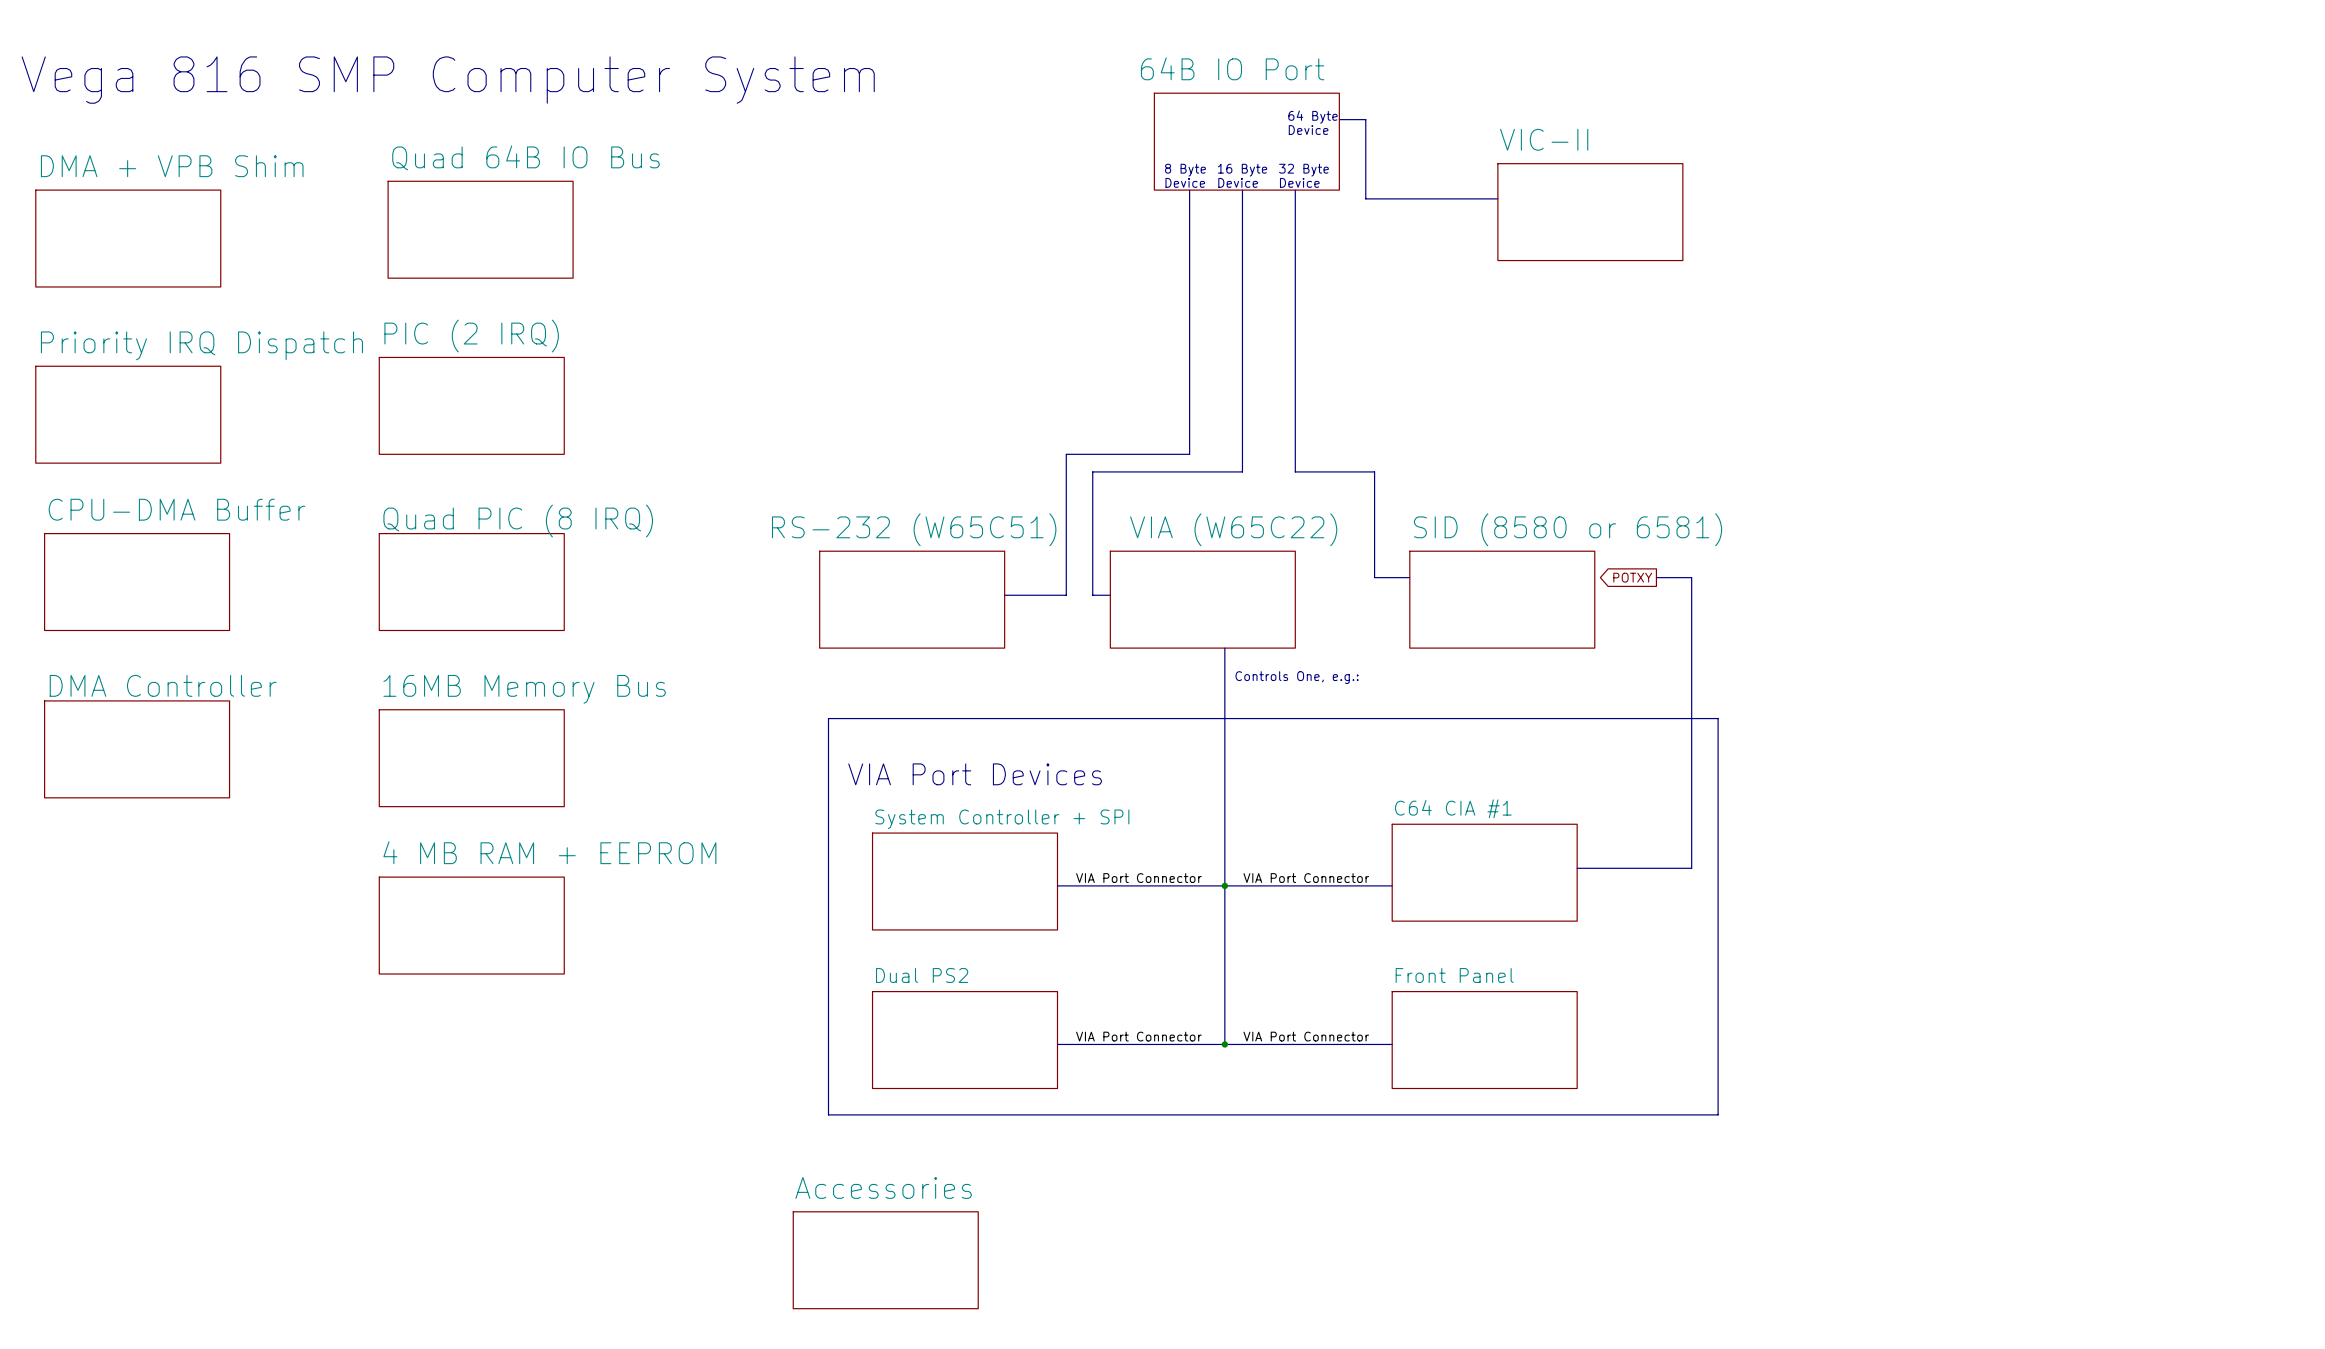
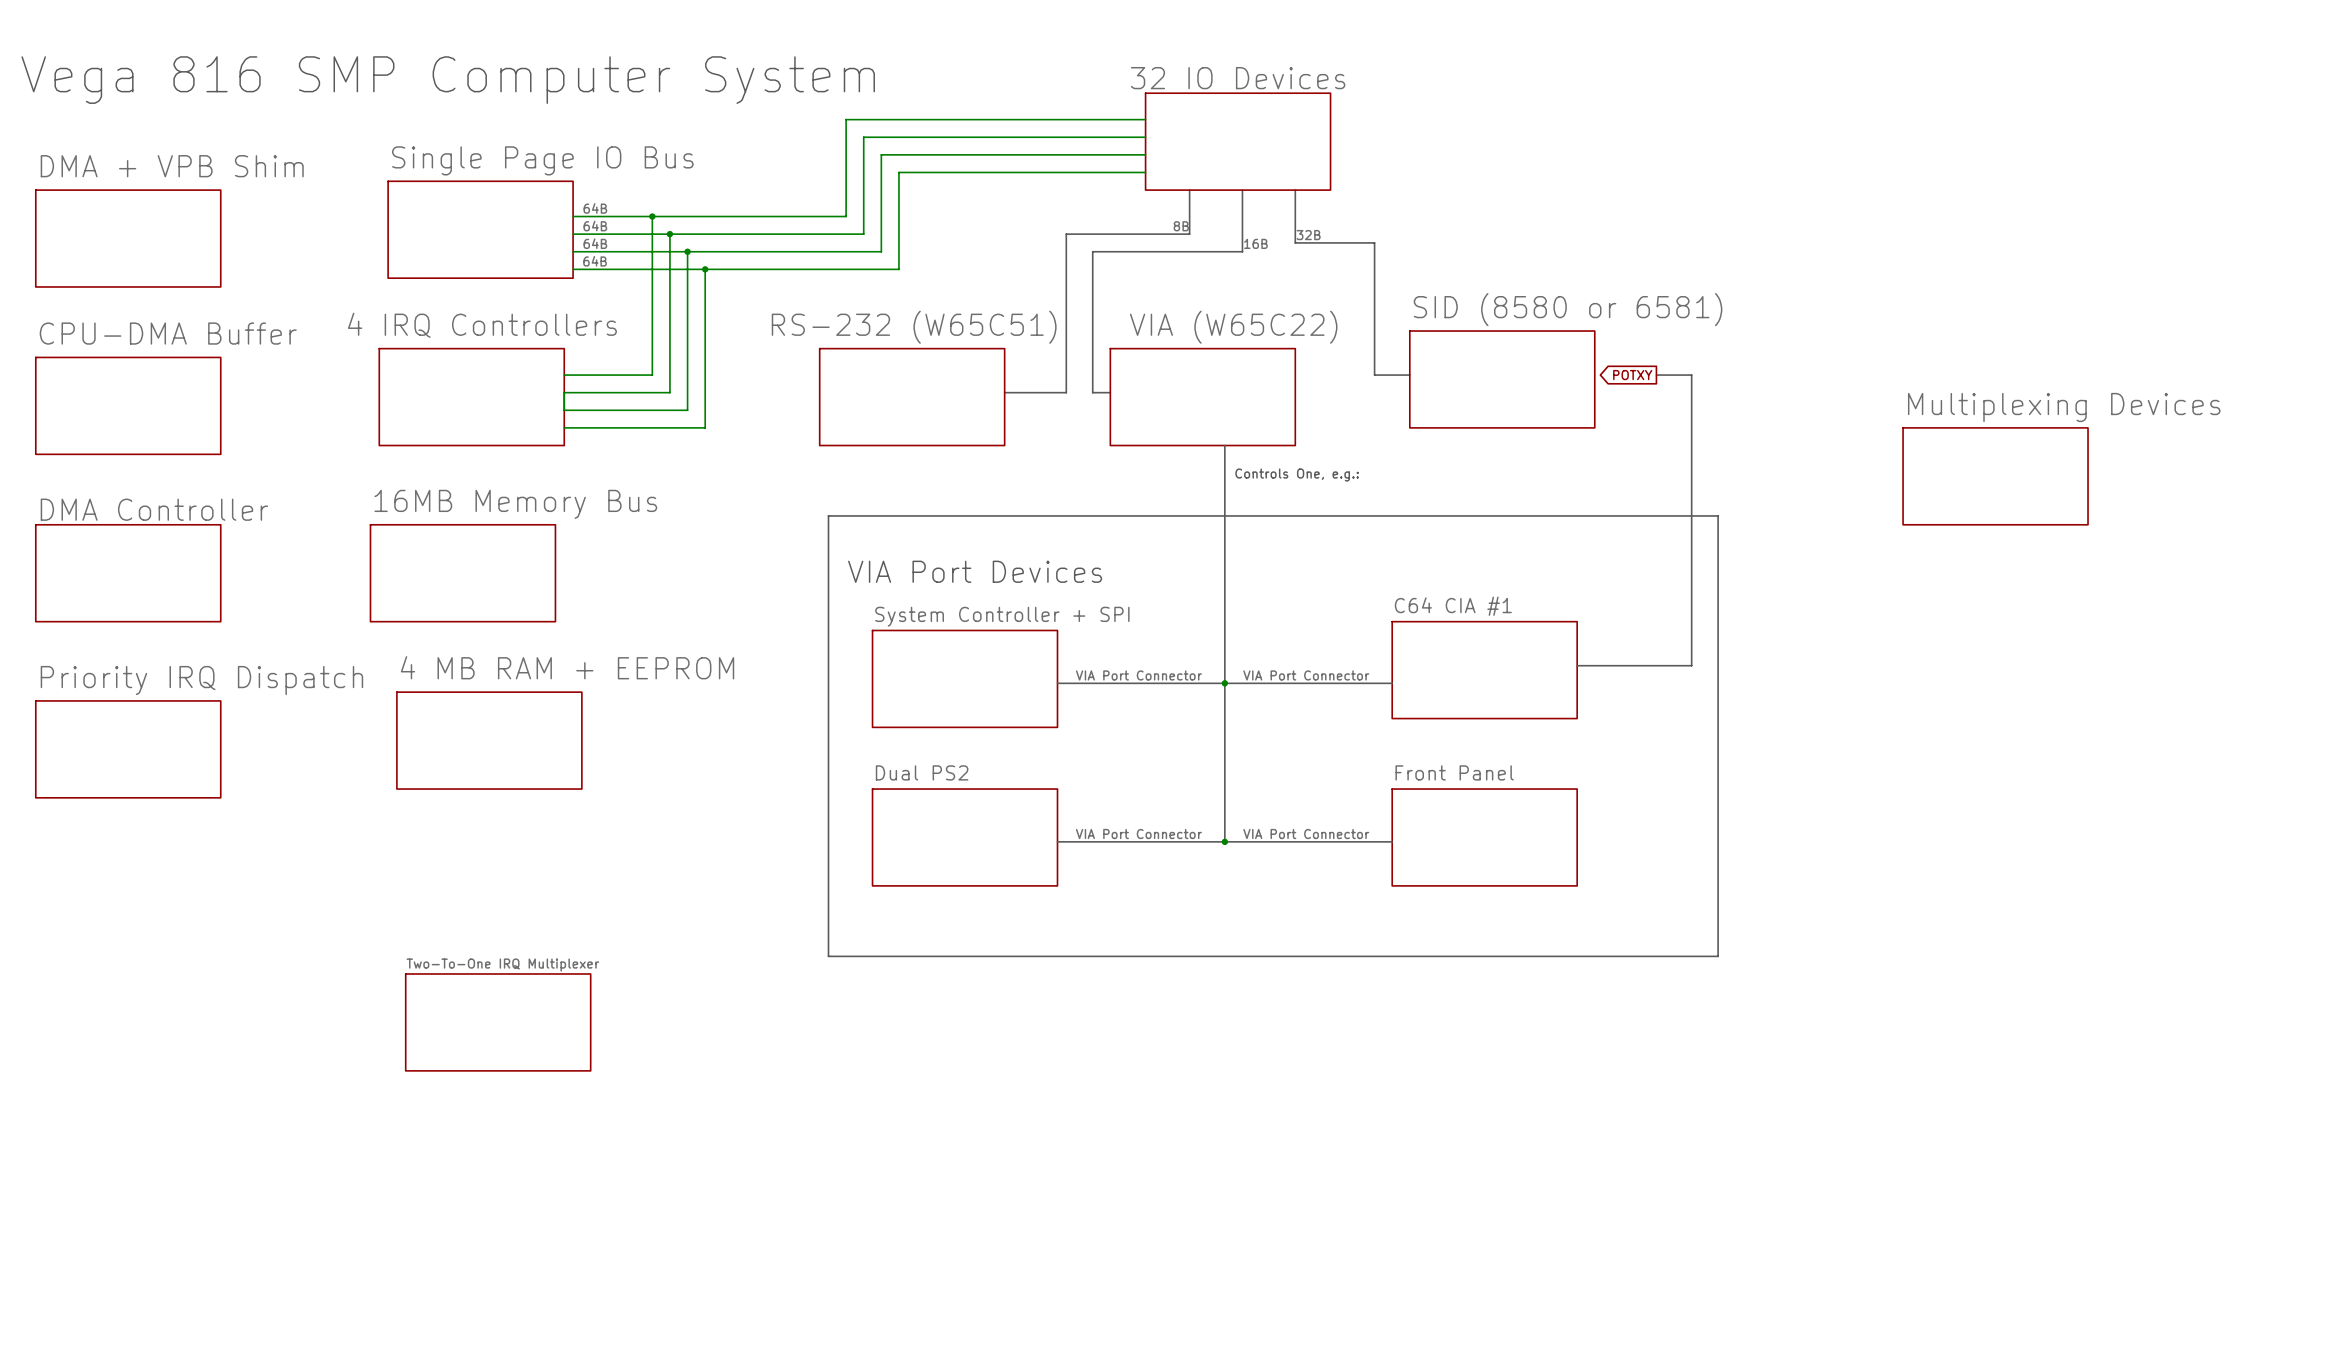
text: 64 Byte (1312, 117) -> none
wire: none -> (1145, 119) (846, 119) (846, 216) (573, 216)
line: (1339, 119) (1365, 119) (1365, 198) (1497, 198) -> none
text: Device (1308, 130) -> none
wire: none -> (1145, 137) (863, 137) (863, 234) (573, 234)
sheet 32 IO Devices: none -> (1238, 141)
sheet 64B IO Port: (1246, 141) -> none
wire: none -> (1145, 154) (881, 154) (881, 251) (573, 251)
sheet Quad 64B IO Bus name: Quad 64B IO Bus (526, 157) -> Single Page IO Bus (542, 160)
text: 8 Byte (1185, 170) -> none
text: 16 Byte (1242, 170) -> none
text: 32 Byte (1303, 170) -> none
wire: none -> (1145, 172) (898, 172) (898, 269) (573, 269)
text: Device (1185, 182) -> none
text: Device (1238, 182) -> none
text: Device (1299, 182) -> none
label: none -> 64B (595, 208)
sheet VIC-II: (1590, 212) -> none
wire: none -> (652, 216) (652, 375) (564, 375)
junction: none -> (652, 216)
label: none -> 64B (595, 226)
label: none -> 8B (1181, 226)
wire: none -> (669, 234) (669, 392) (564, 392) (564, 410) (687, 410) (687, 251)
junction: none -> (669, 234)
line: (1189, 234) (1189, 454) (1066, 454) (1066, 595) (1004, 595) -> (1189, 234) (1066, 234) (1066, 392) (1004, 392)
label: none -> 32B (1308, 235)
line: (1295, 242) (1295, 471) (1374, 471) (1374, 577) (1409, 577) -> (1295, 242) (1374, 242) (1374, 375) (1409, 375)
label: none -> 64B (595, 243)
label: none -> 16B (1255, 243)
junction: none -> (687, 251)
line: (1242, 251) (1242, 471) (1092, 471) (1092, 595) (1110, 595) -> (1242, 251) (1092, 251) (1092, 392) (1110, 392)
label: none -> 64B (595, 261)
wire: none -> (705, 269) (705, 427) (564, 427)
junction: none -> (705, 269)
global label: none -> POTXY (1632, 375)
sheet 4 IRQ Controllers: none -> (471, 397)
sheet CPU-DMA Buffer: none -> (128, 405)
sheet PIC (2 IRQ): (471, 405) -> none
sheet Priority IRQ Dispatch: (128, 414) -> none
bus: none -> (1224, 445) (1224, 648)
text: none -> Controls One, e.g.: (1297, 475)
sheet Multiplexing Devices: none -> (1995, 476)
text: none -> VIA Port Devices (975, 571)
sheet DMA Controller: none -> (128, 573)
global label: POTXY (1632, 577) -> none
bus: (1656, 577) (1691, 577) -> (1656, 375) (1691, 375) (1691, 577)
sheet CPU-DMA Buffer: (137, 582) -> none
sheet Quad PIC (8 IRQ): (471, 582) -> none
sheet RS-232 (W65C51) position: (912, 599) -> (912, 397)
sheet VIA (W65C22) position: (1202, 599) -> (1202, 397)
sheet SID (8580 or 6581) position: (1502, 599) -> (1502, 379)
bus: (1691, 665) (1691, 868) (1577, 868) -> (1691, 665) (1577, 665)
label: none -> VIA Port Connector (1138, 675)
label: none -> VIA Port Connector (1306, 675)
text: Controls One, e.g.: (1297, 677) -> none
sheet System Controller + SPI: none -> (965, 678)
bus: none -> (1057, 683) (1392, 683)
junction: none -> (1224, 683)
line: (828, 718) (1718, 718) -> (828, 718) (828, 515) (1718, 515) (1718, 718)
sheet Priority IRQ Dispatch: none -> (128, 749)
sheet DMA Controller: (137, 749) -> none
sheet 16MB Memory Bus position: (471, 758) -> (462, 573)
text: VIA Port Devices (975, 774) -> none
sheet Front Panel: none -> (1484, 837)
bus: (1224, 841) (1224, 1044) -> none
junction: none -> (1224, 841)
sheet C64 CIA #1 position: (1484, 872) -> (1484, 670)
label position: VIA Port Connector (1138, 878) -> VIA Port Connector (1138, 834)
label position: VIA Port Connector (1306, 878) -> VIA Port Connector (1306, 834)
sheet System Controller + SPI: (965, 881) -> none
bus: (1057, 885) (1392, 885) -> (1057, 841) (1392, 841)
junction: (1224, 885) -> none
sheet 4 MB RAM + EEPROM position: (471, 925) -> (489, 740)
line: (828, 956) (828, 1114) (1718, 1114) (1718, 956) -> (828, 956) (1718, 956)
sheet Two-To-One IRQ Multiplexer: none -> (498, 1022)
label: VIA Port Connector (1138, 1036) -> none
label: VIA Port Connector (1306, 1036) -> none
sheet Dual PS2 position: (965, 1040) -> (965, 837)
sheet Front Panel: (1484, 1040) -> none
bus: (1057, 1044) (1392, 1044) -> none
junction: (1224, 1044) -> none
sheet Accessories: (885, 1260) -> none

